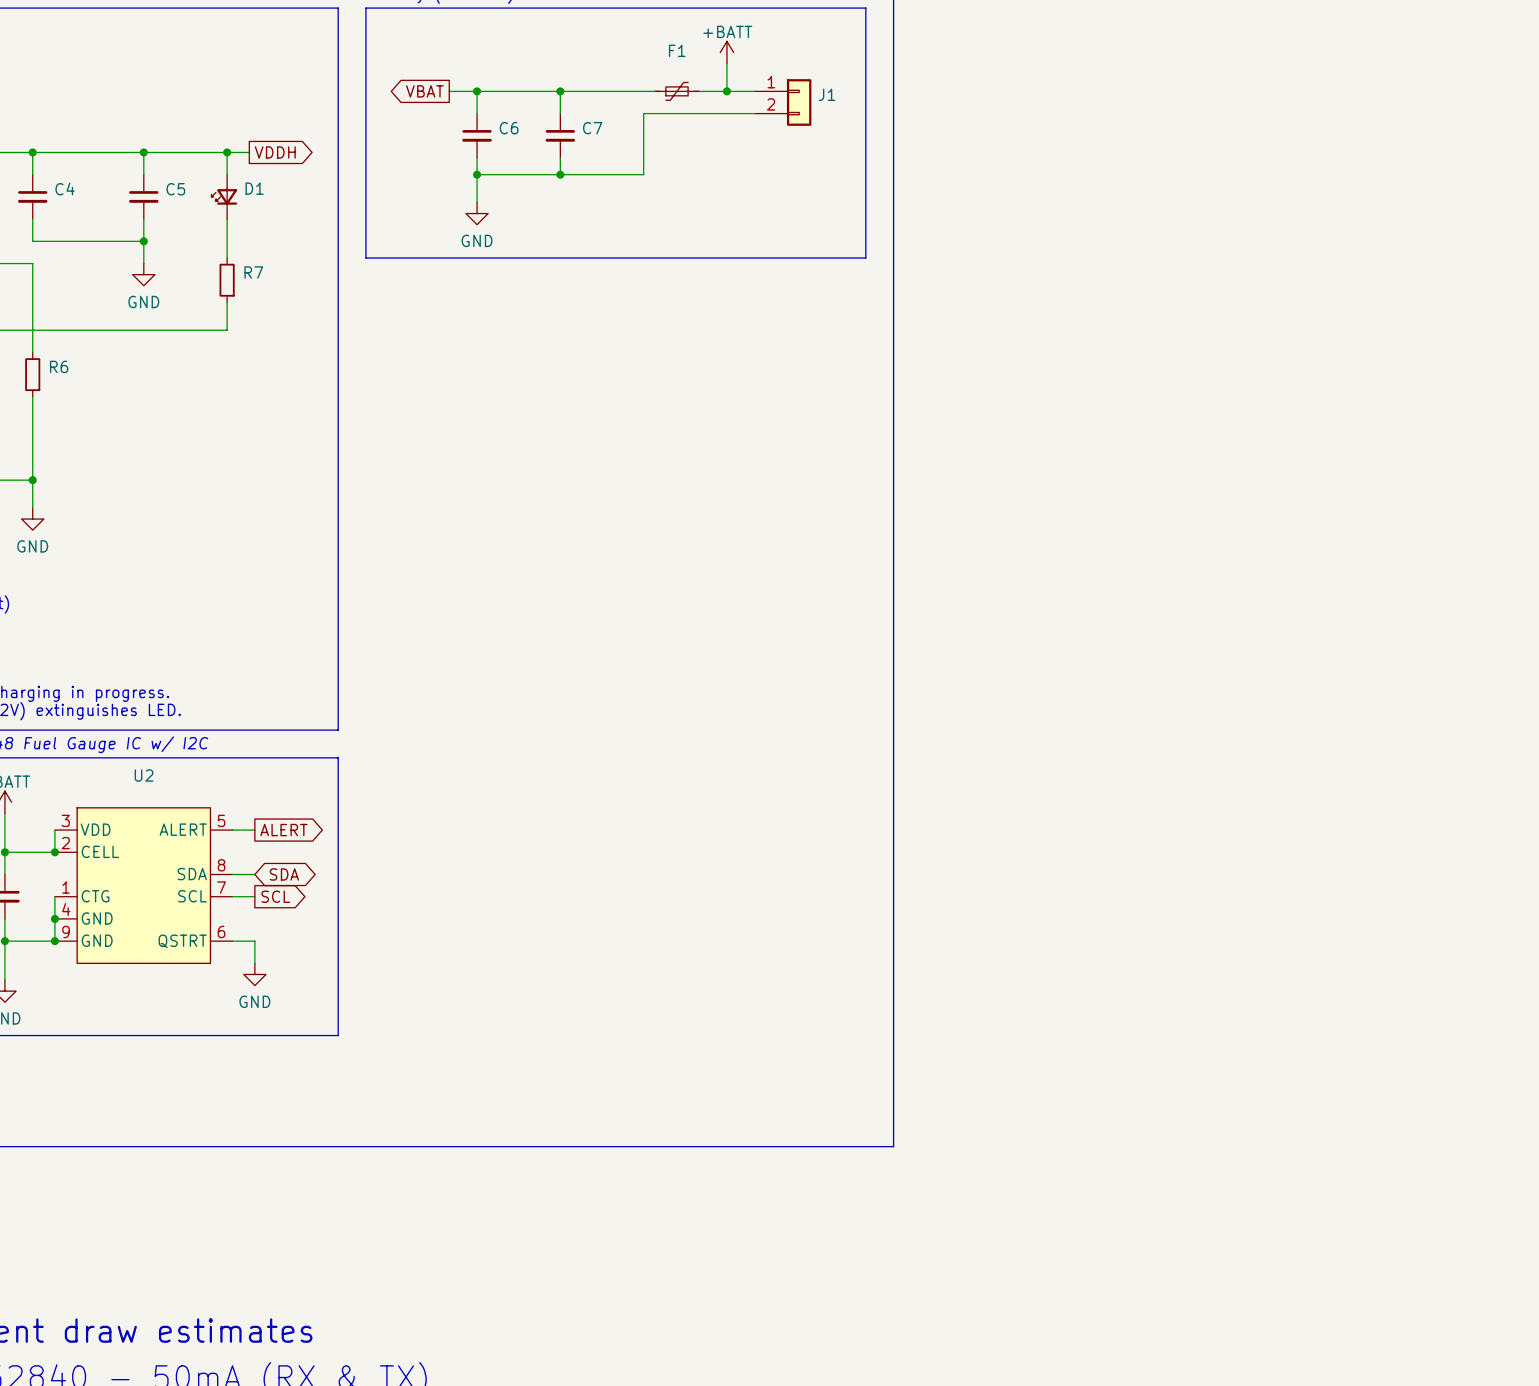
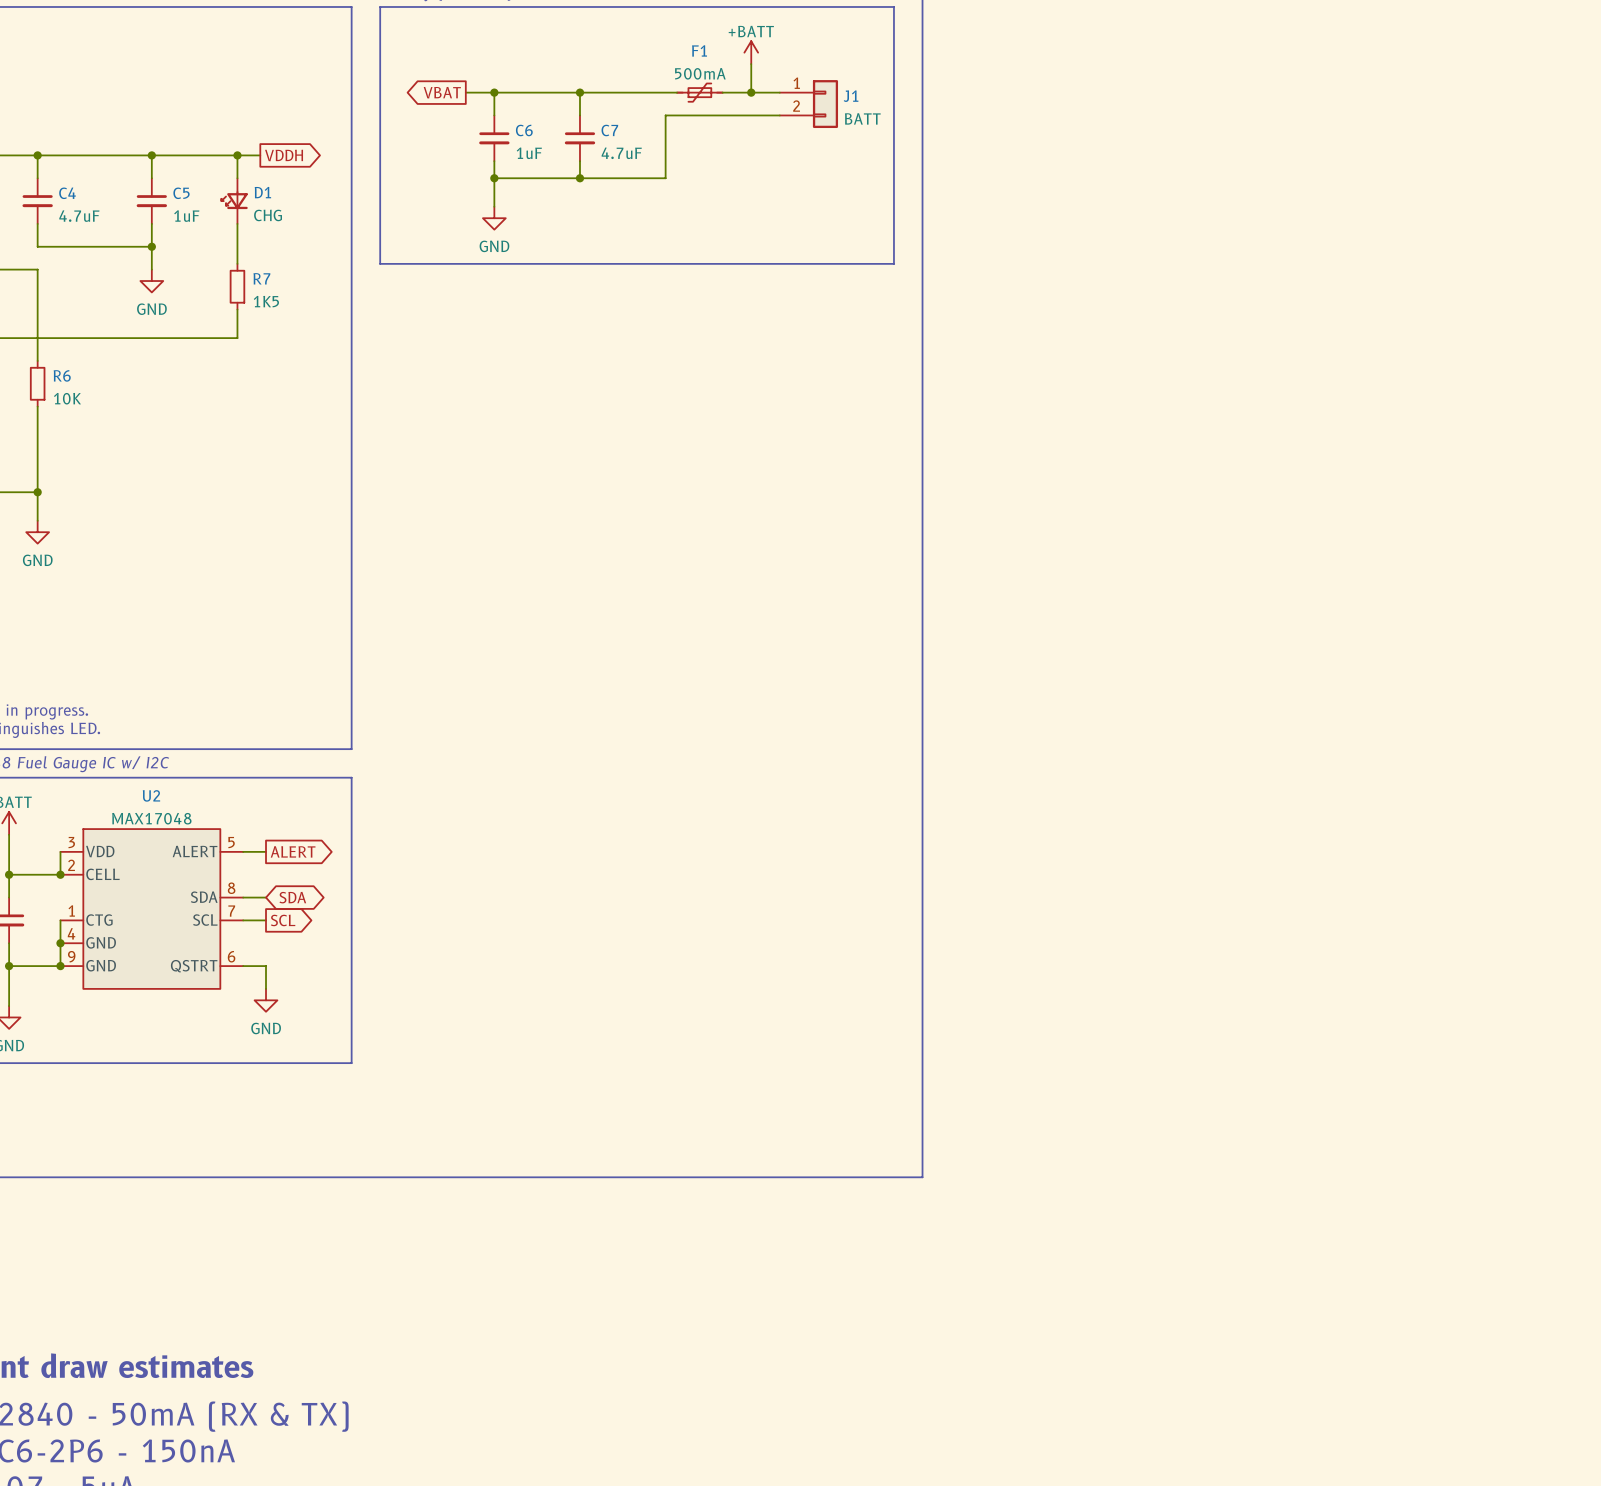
F1 value: none -> 500mA (700, 73)
J1 value: none -> BATT (862, 118)
C6 value: none -> 1uF (529, 153)
C7 value: none -> 4.7uF (621, 153)
D1 value: none -> CHG (268, 215)
C4 value: none -> 4.7uF (79, 216)
C5 value: none -> 1uF (186, 216)
R7 value: none -> 1K5 (266, 301)
R6 value: none -> 10K (67, 398)
U2 value: none -> MAX17048 (151, 818)

